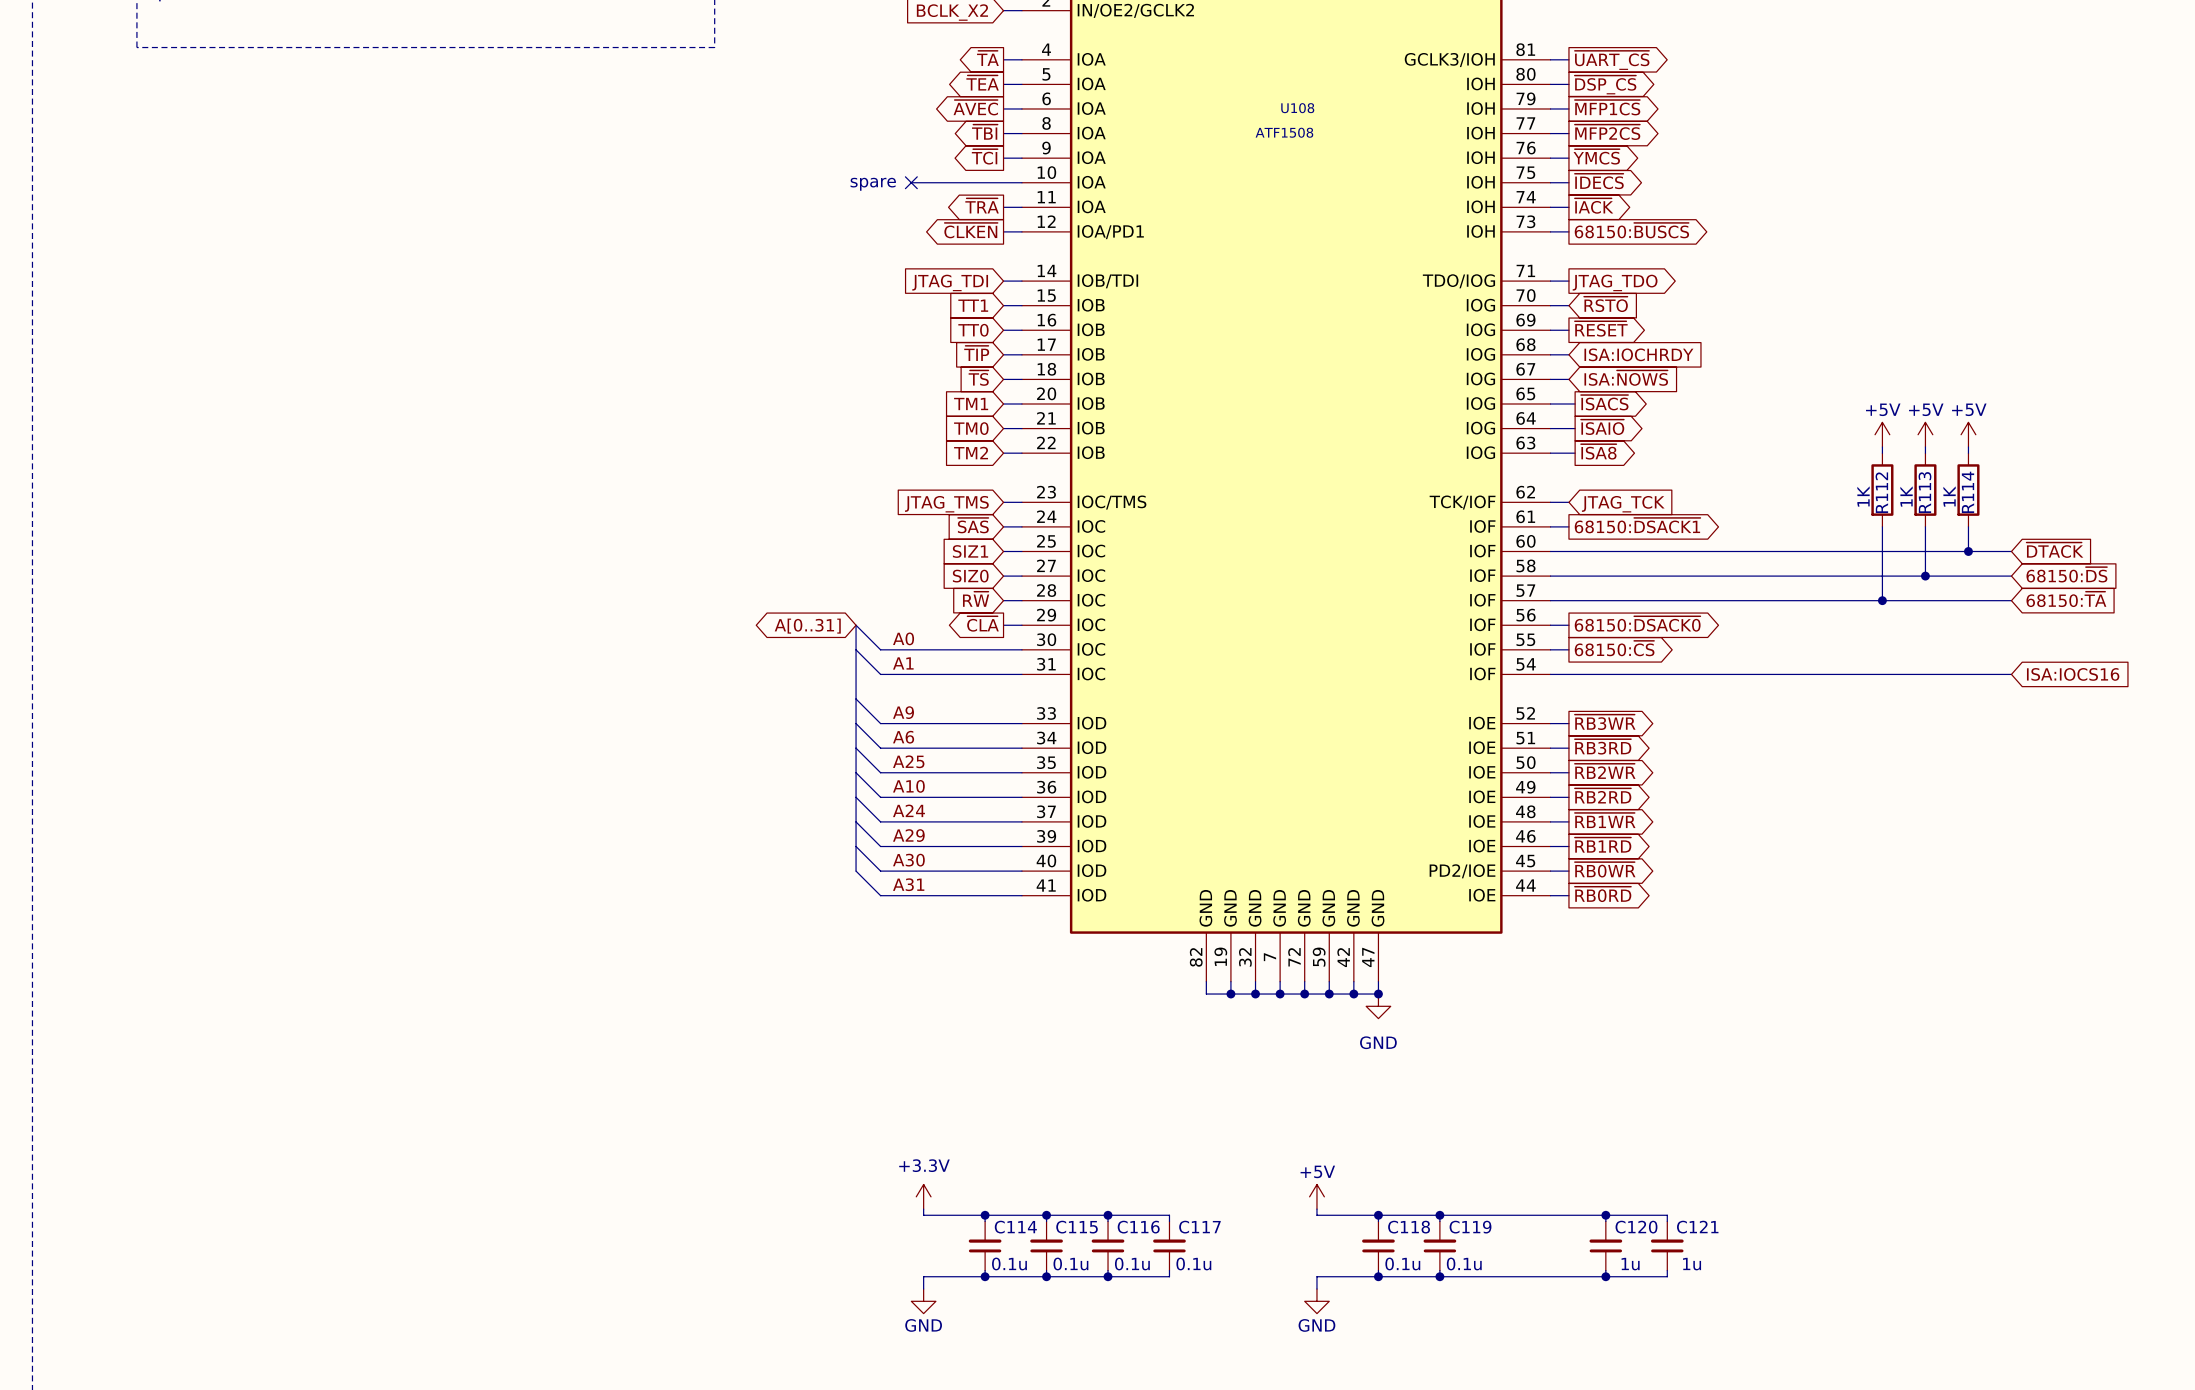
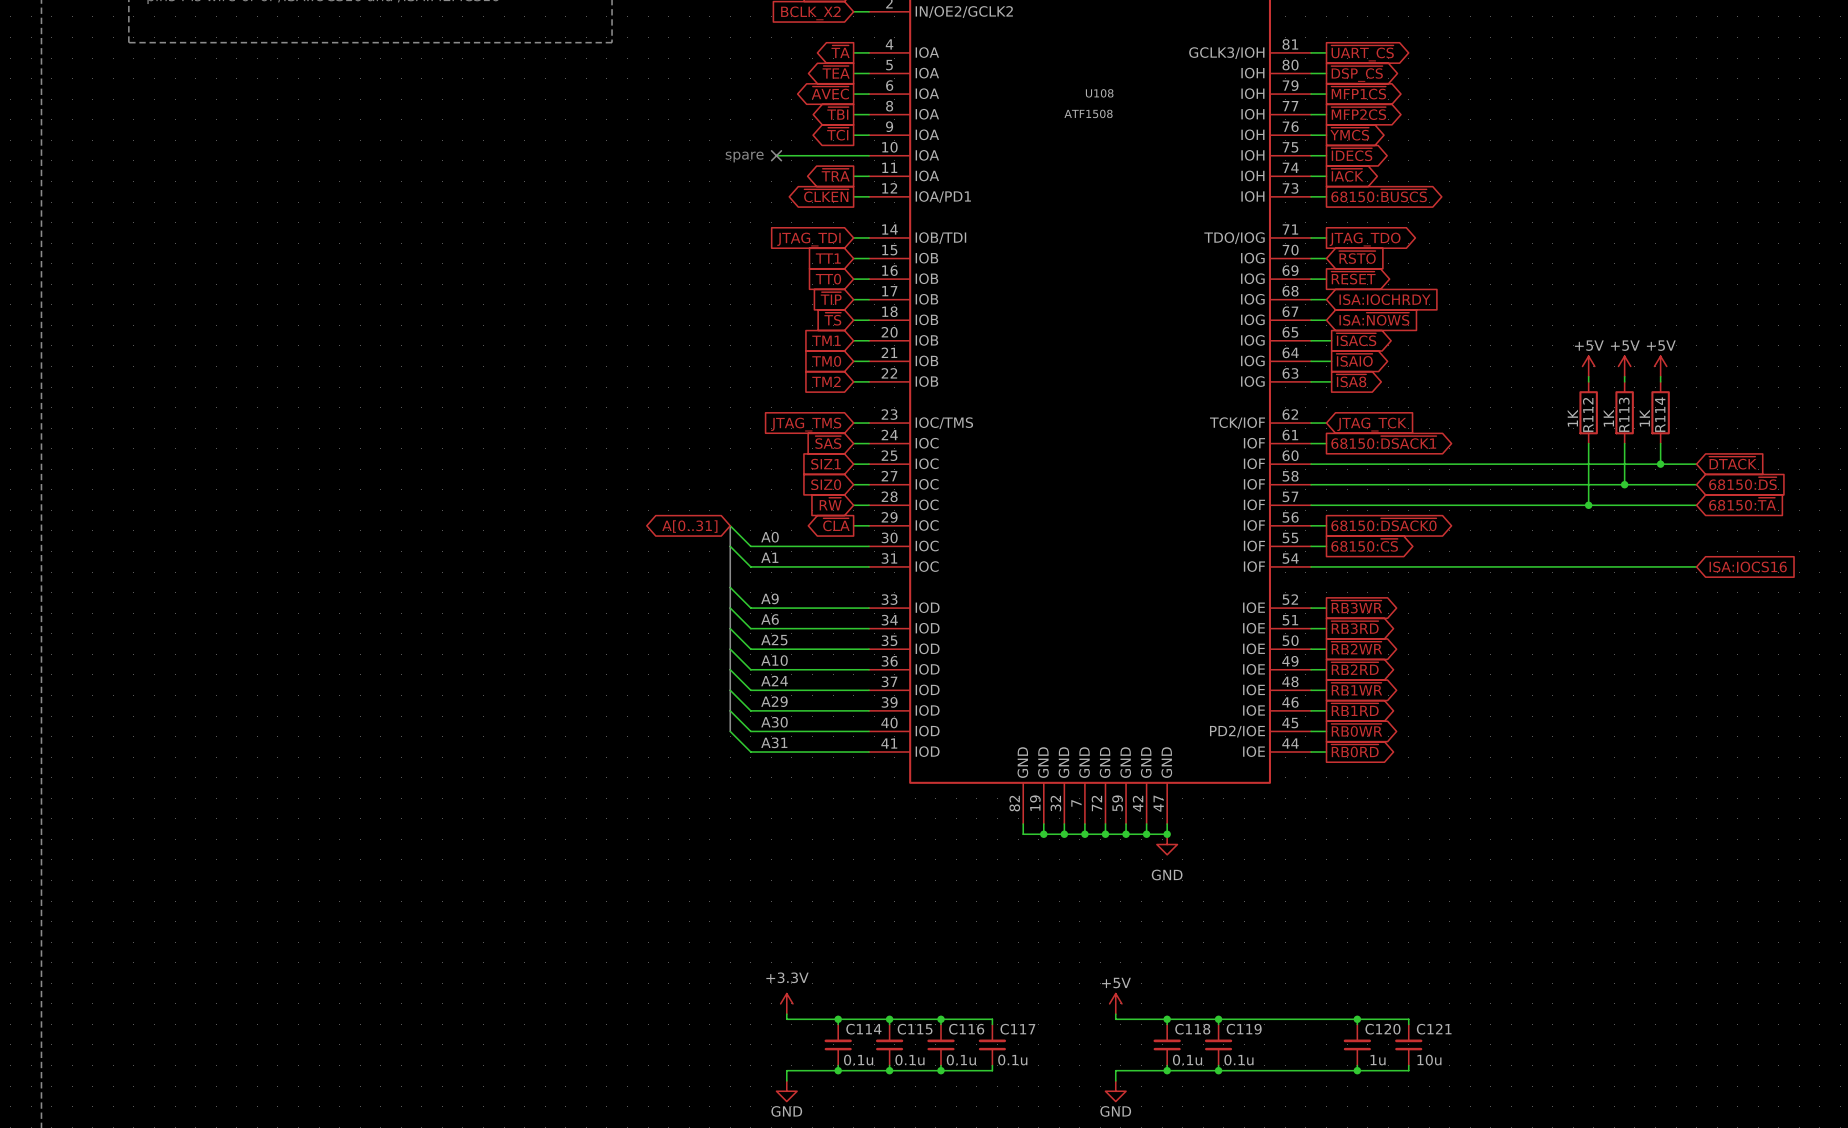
C121 value: 1u (1692, 1264) -> 10u (1429, 1060)

